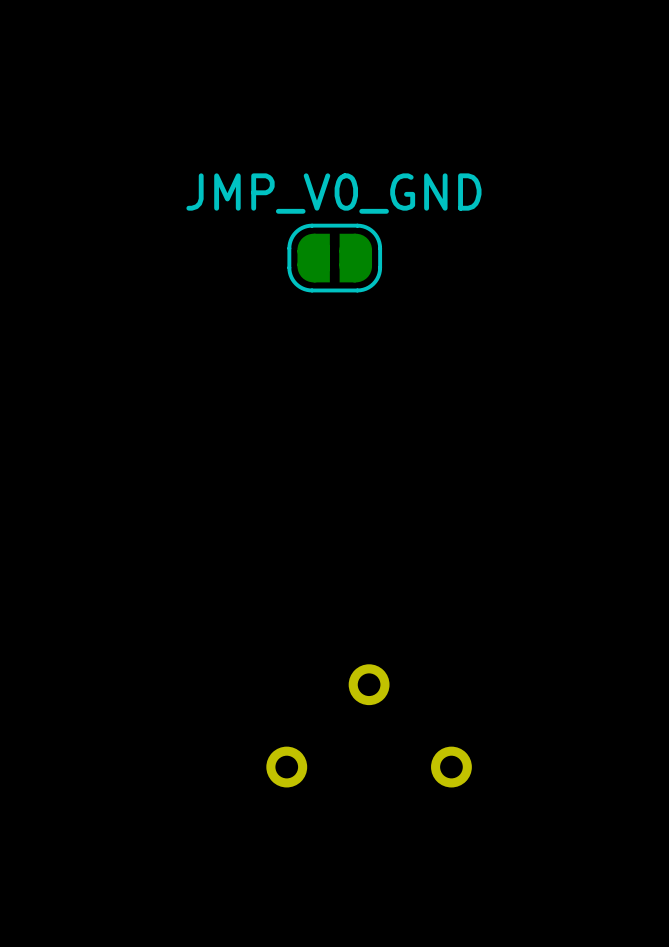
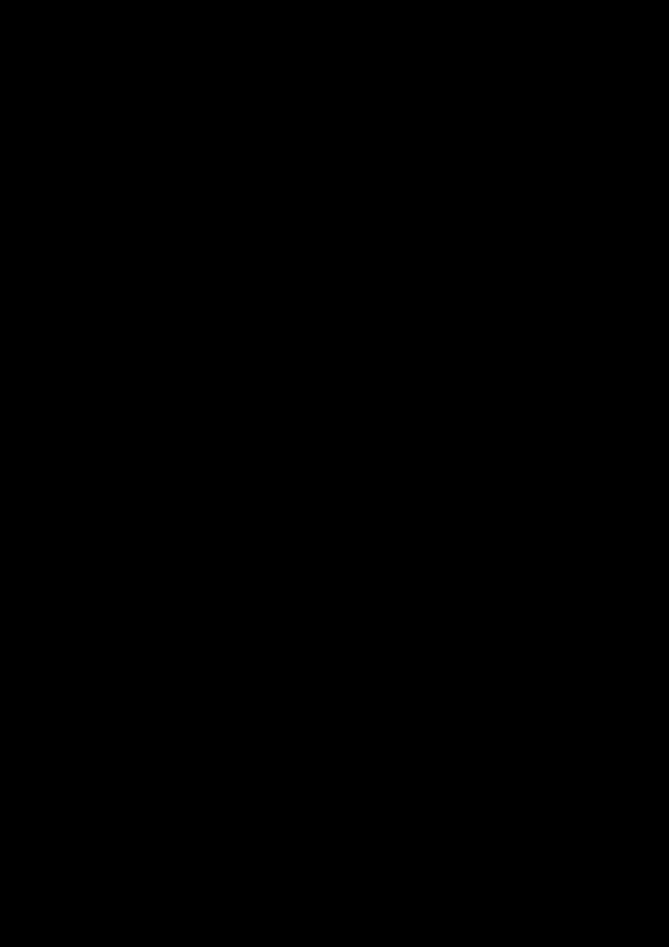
part: JMP_V0_GND (334, 258) -> none
part: (369, 725) -> none

